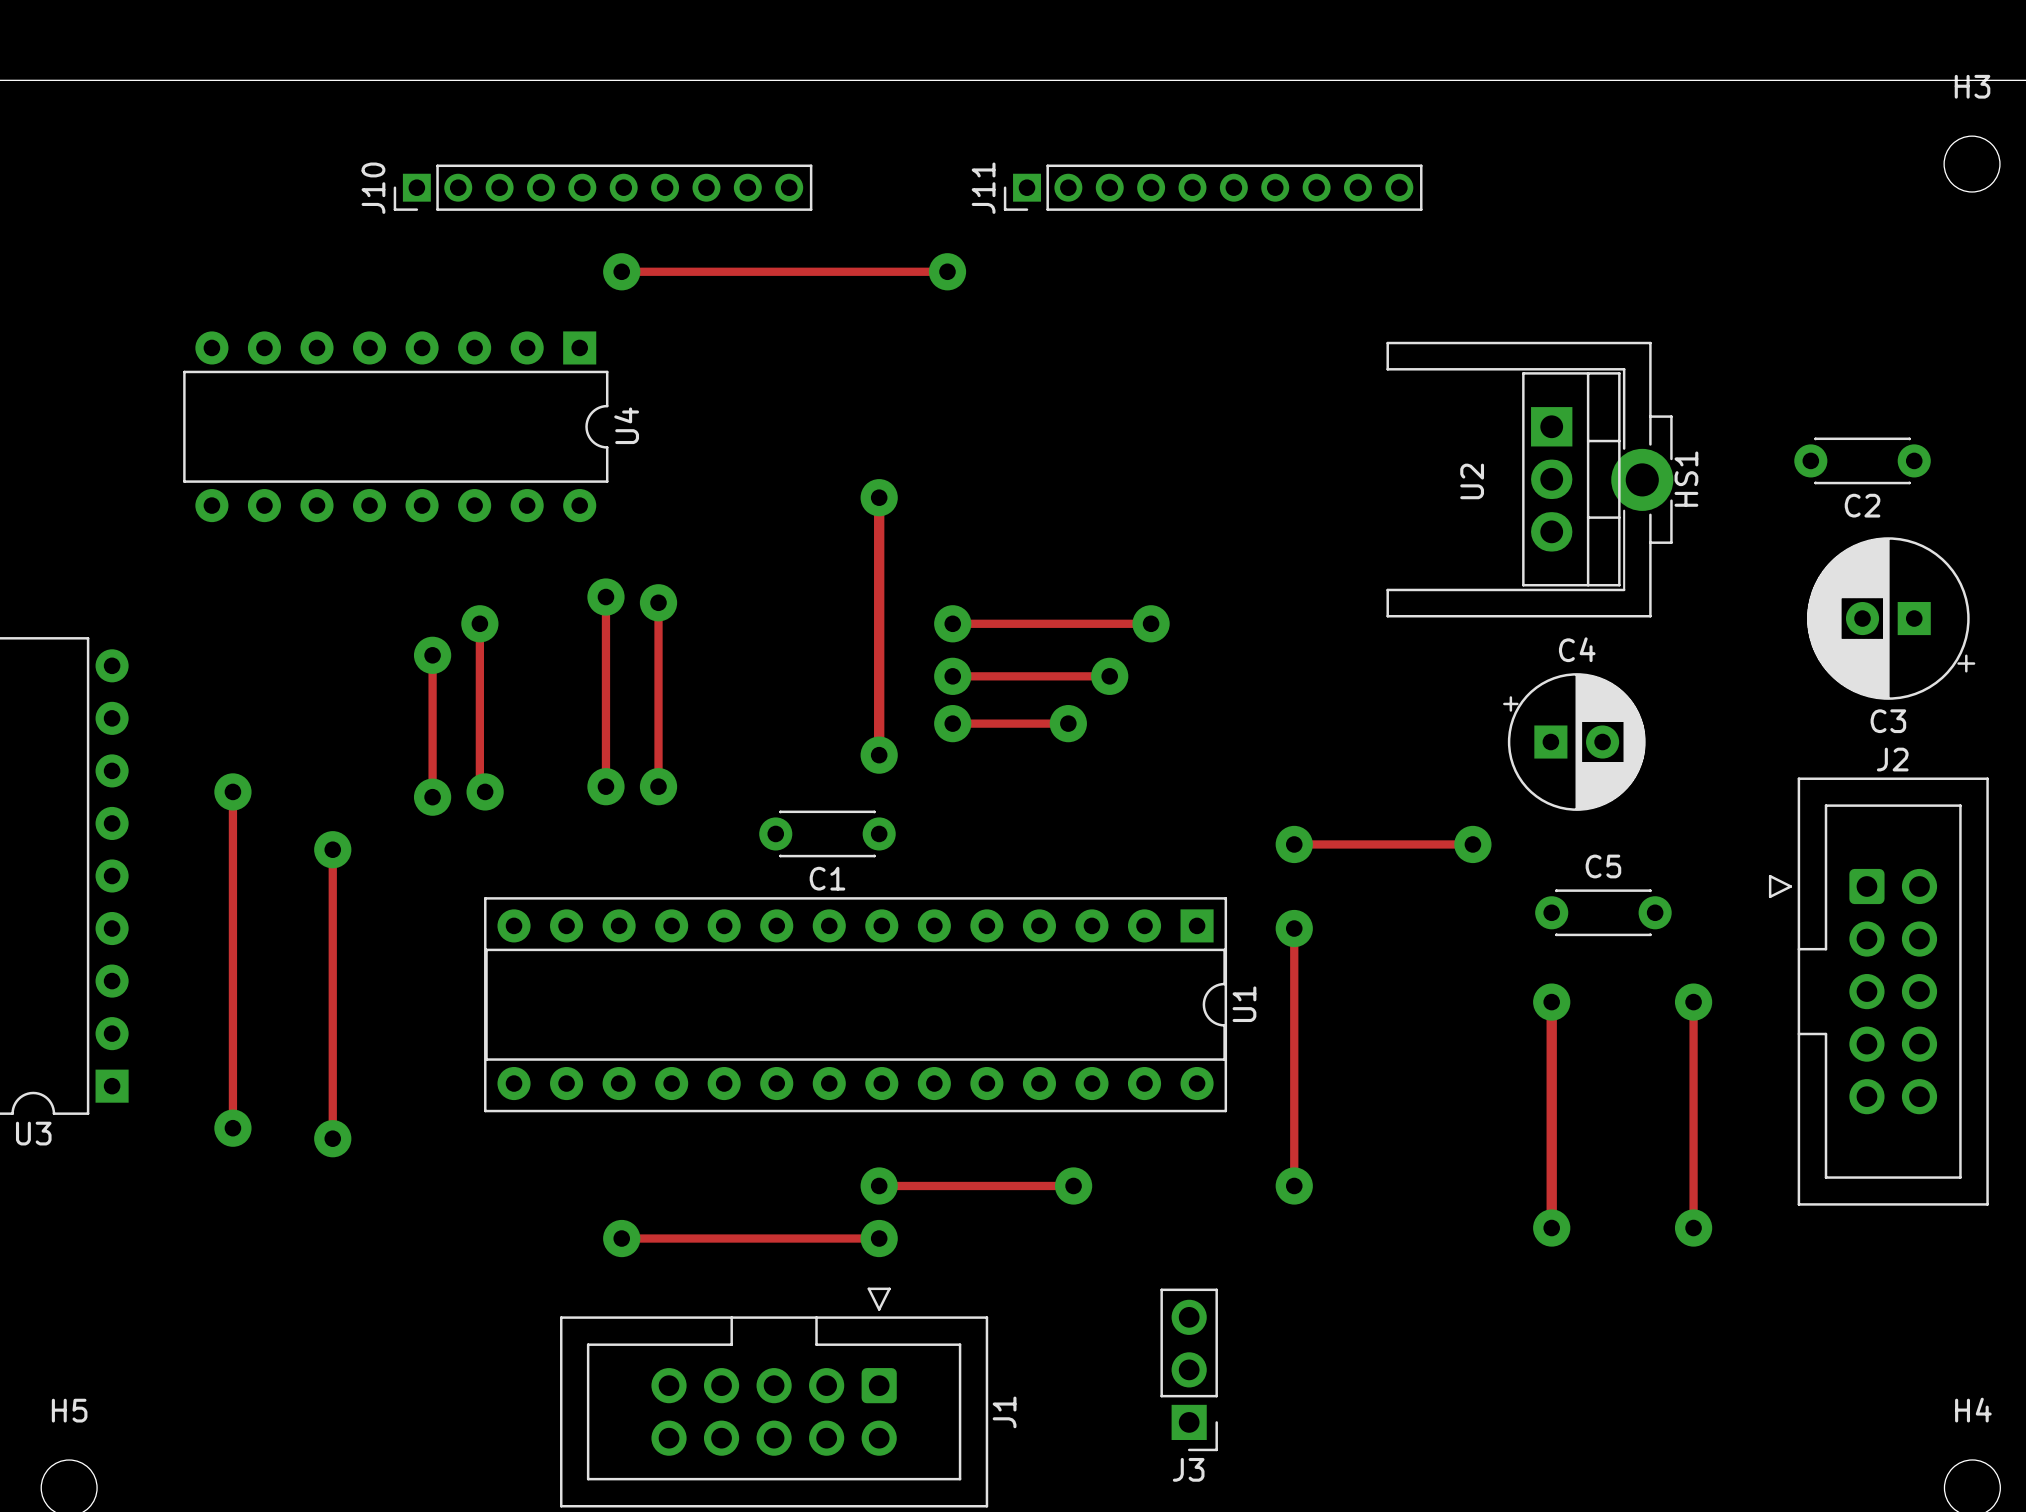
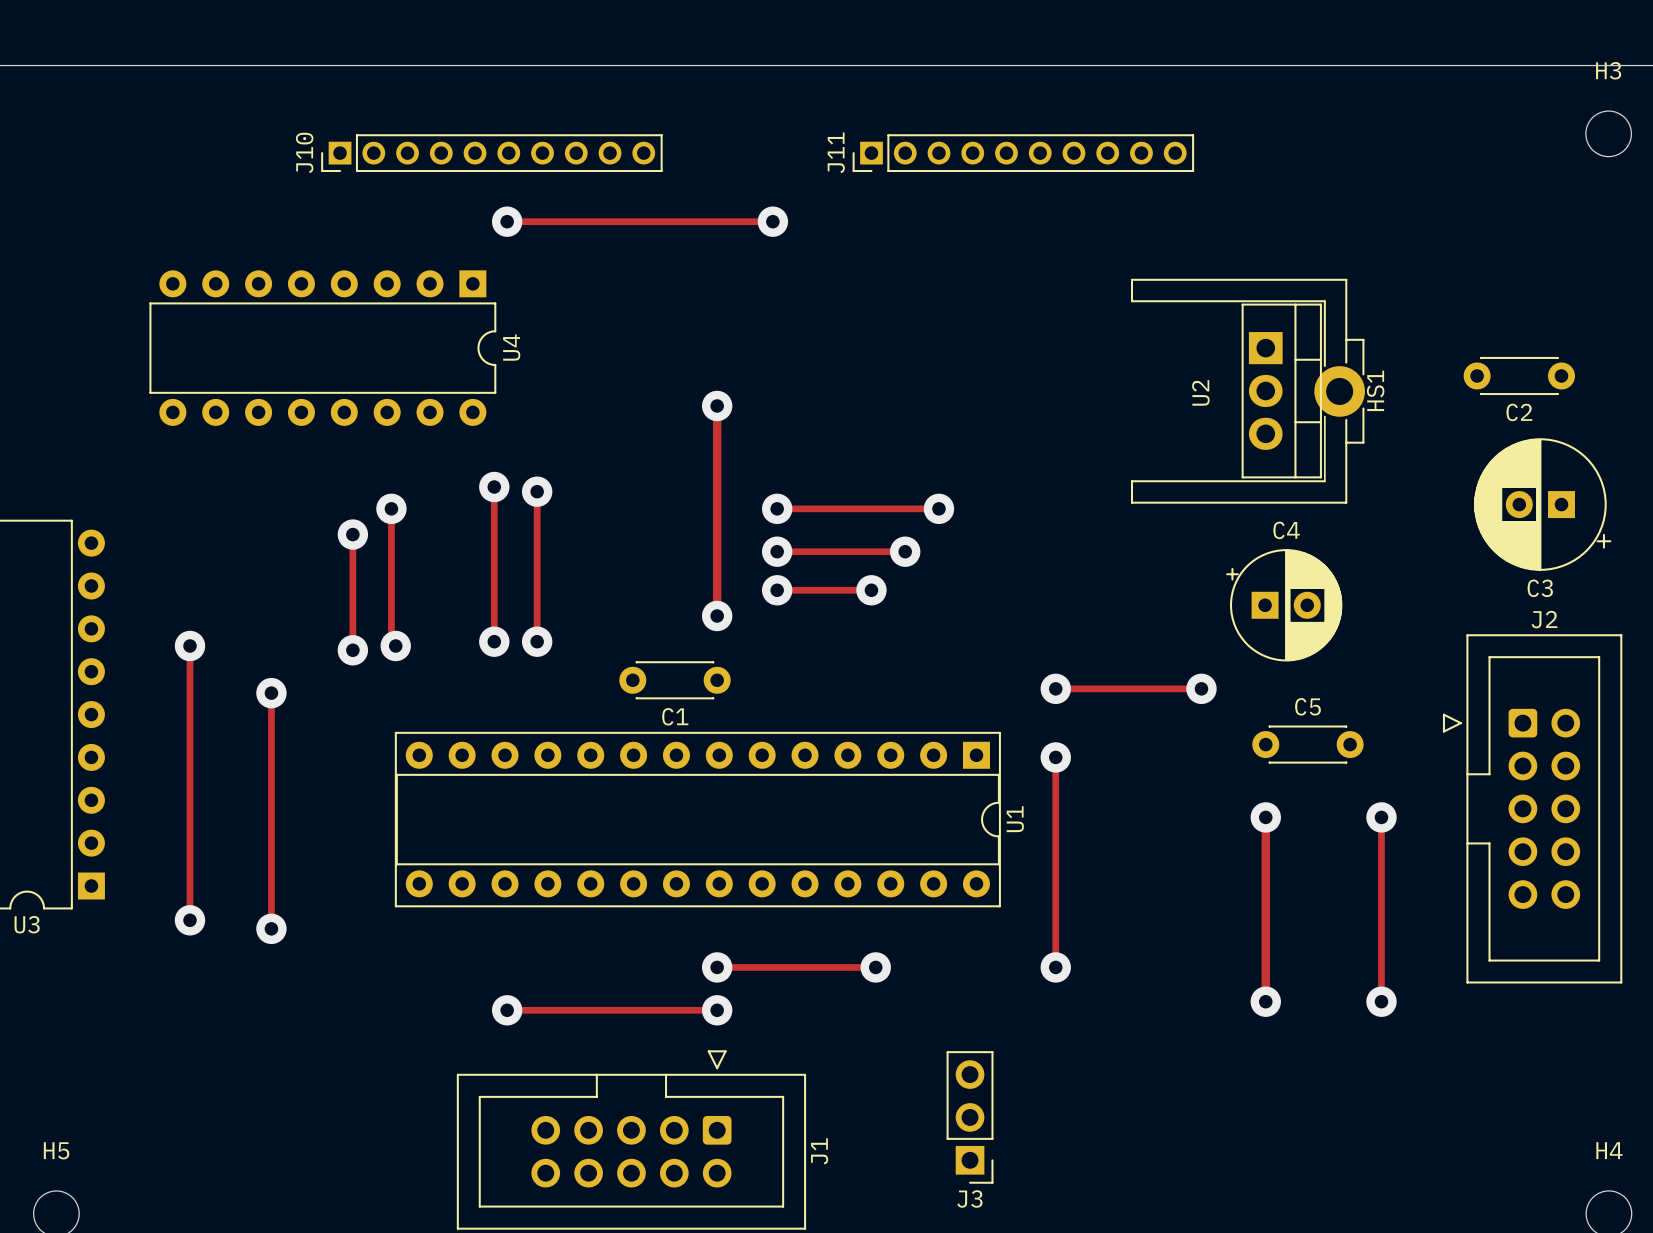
J11 position: (1213, 187) -> (1023, 153)

